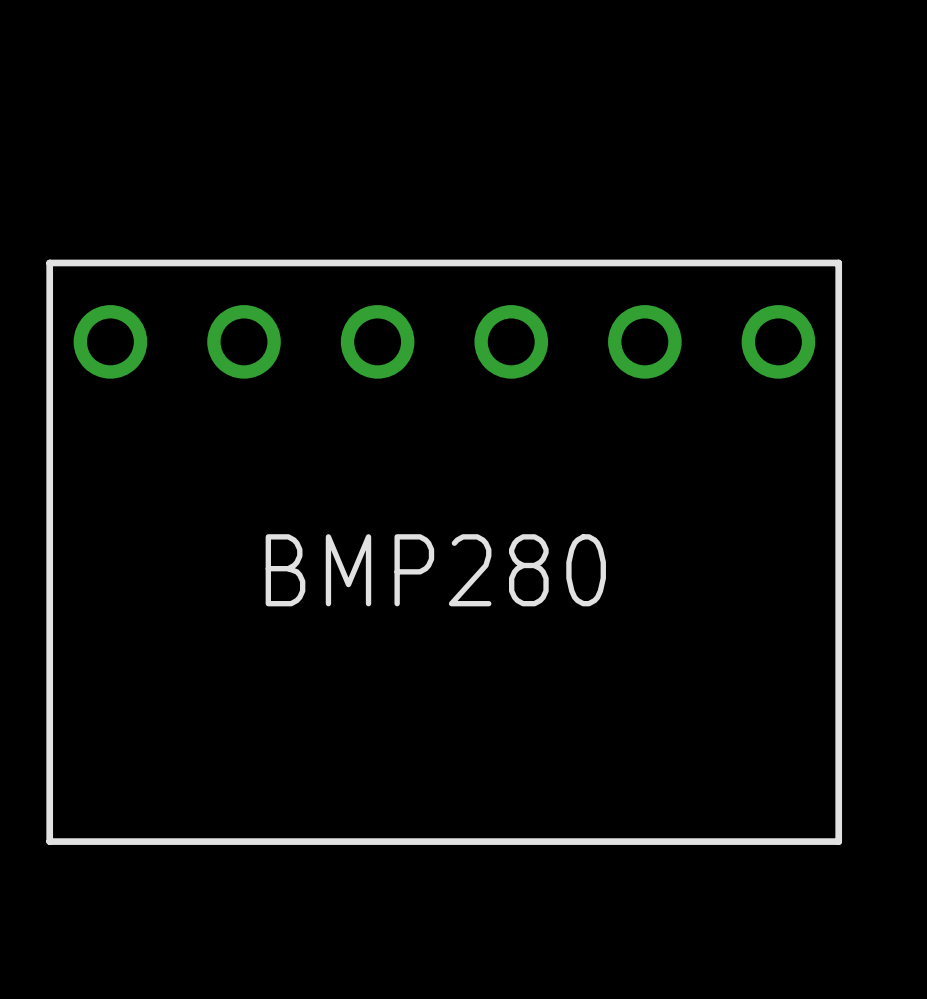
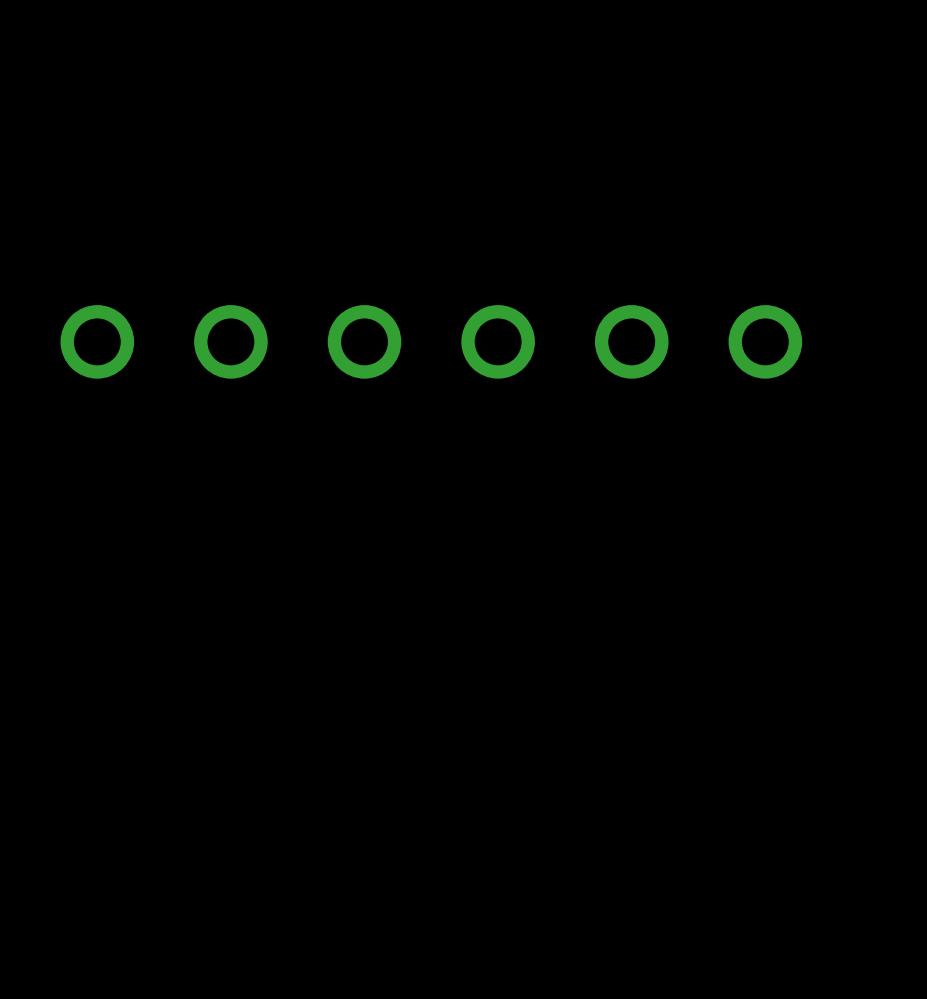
part side: top (444, 552) -> bottom (431, 341)

